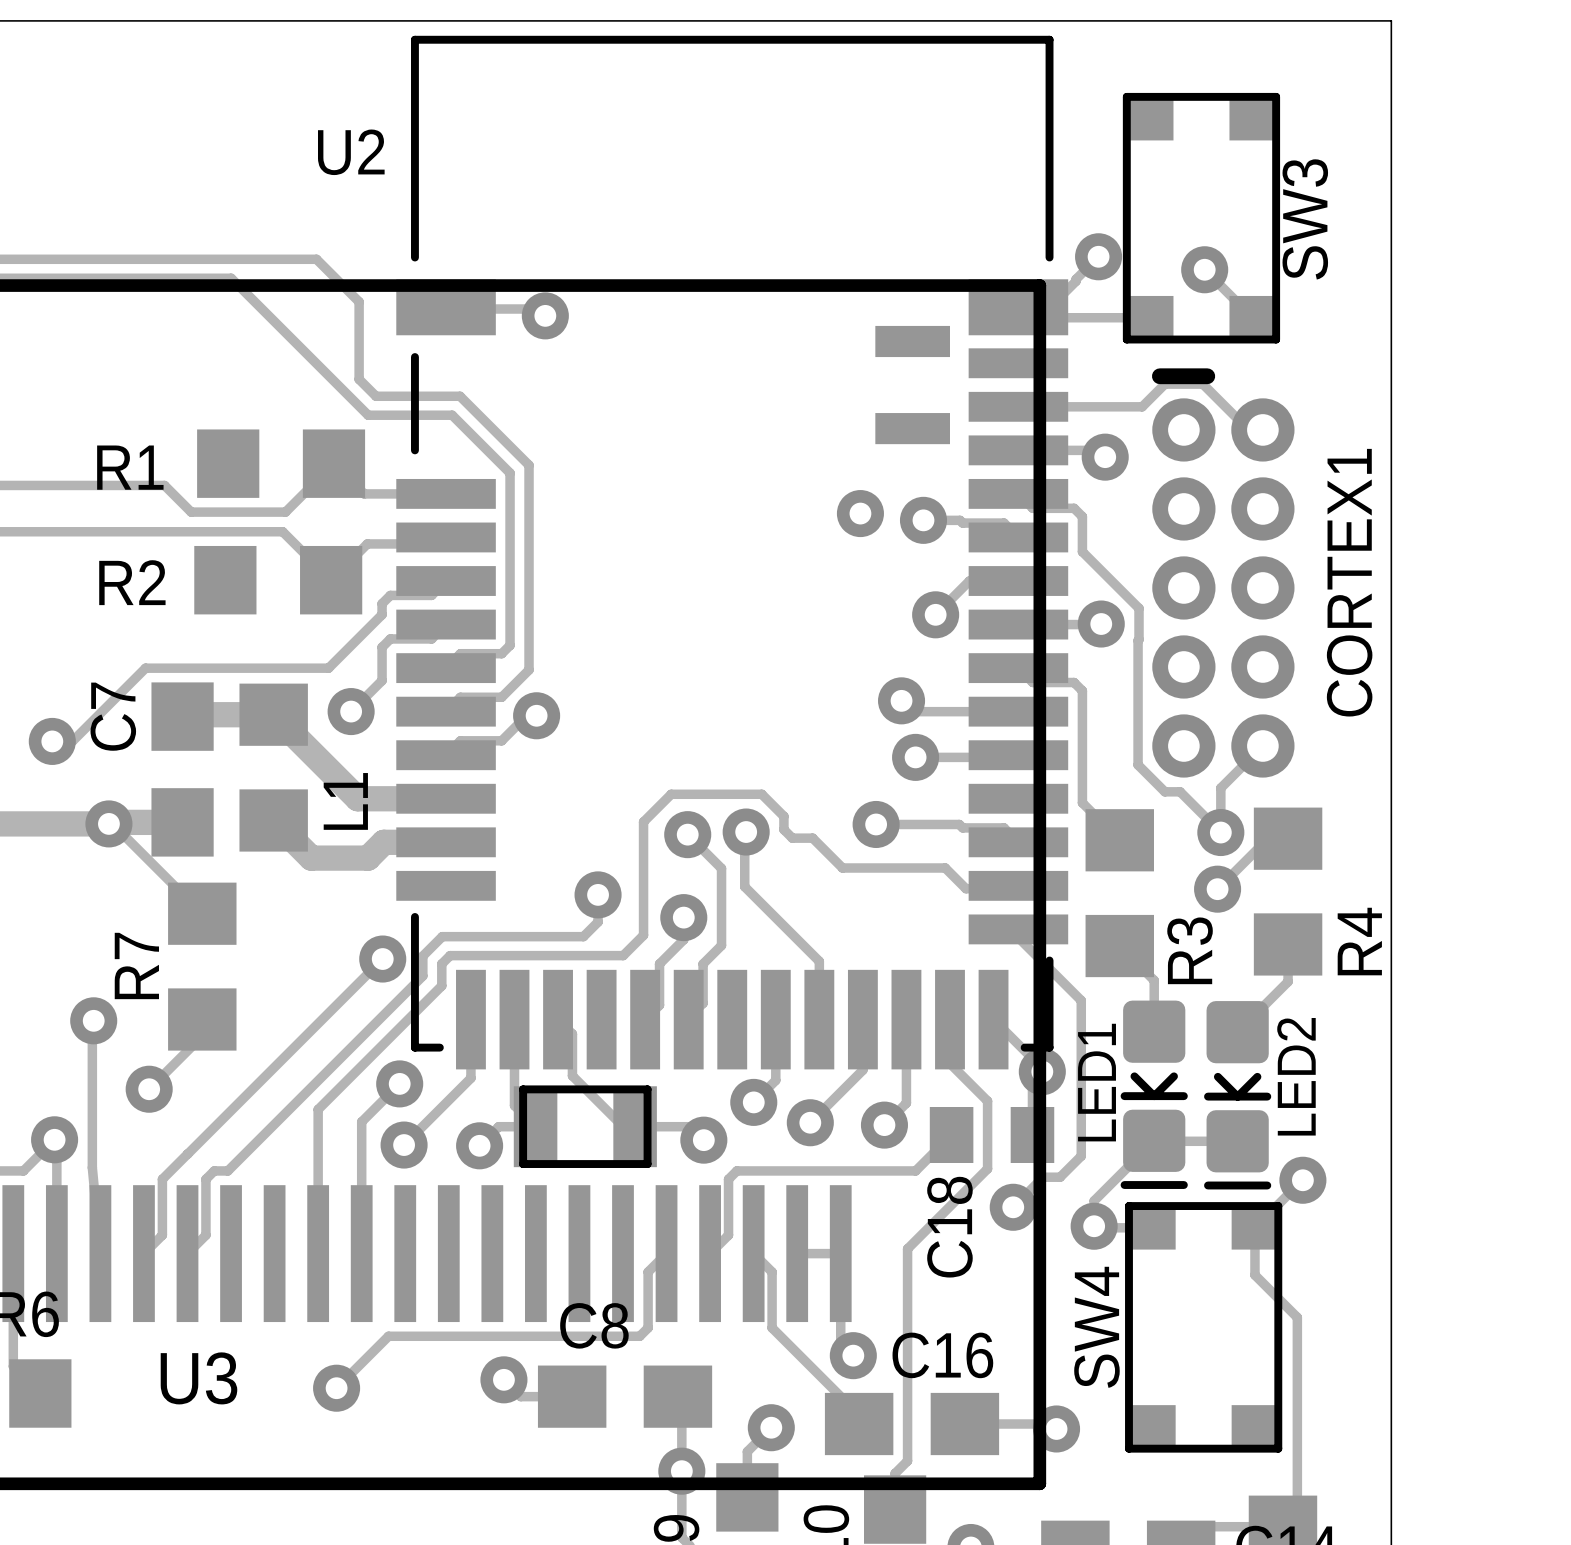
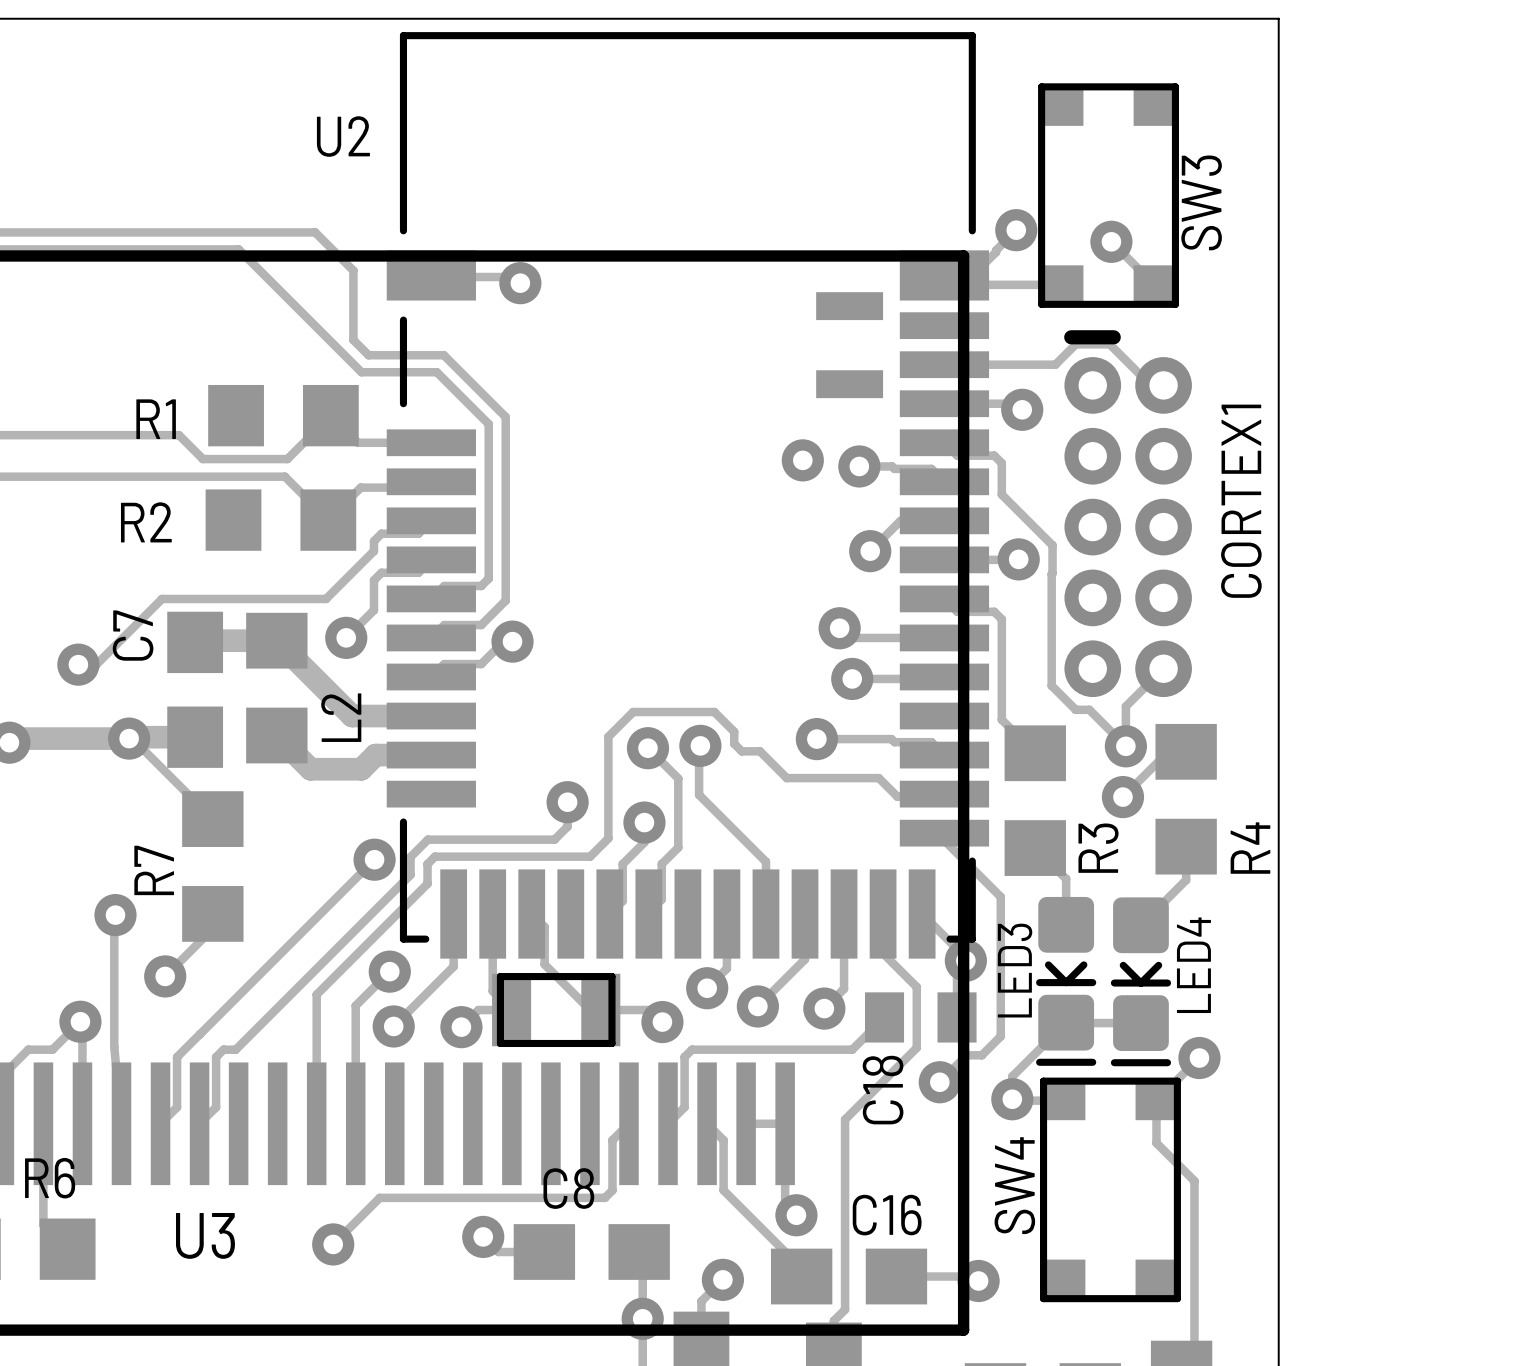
L1 name: L1 (345, 801) -> L2 (341, 717)
LED2 name: LED2 (1296, 1076) -> LED4 (1193, 965)
LED1 name: LED1 (1097, 1082) -> LED3 (1015, 970)

